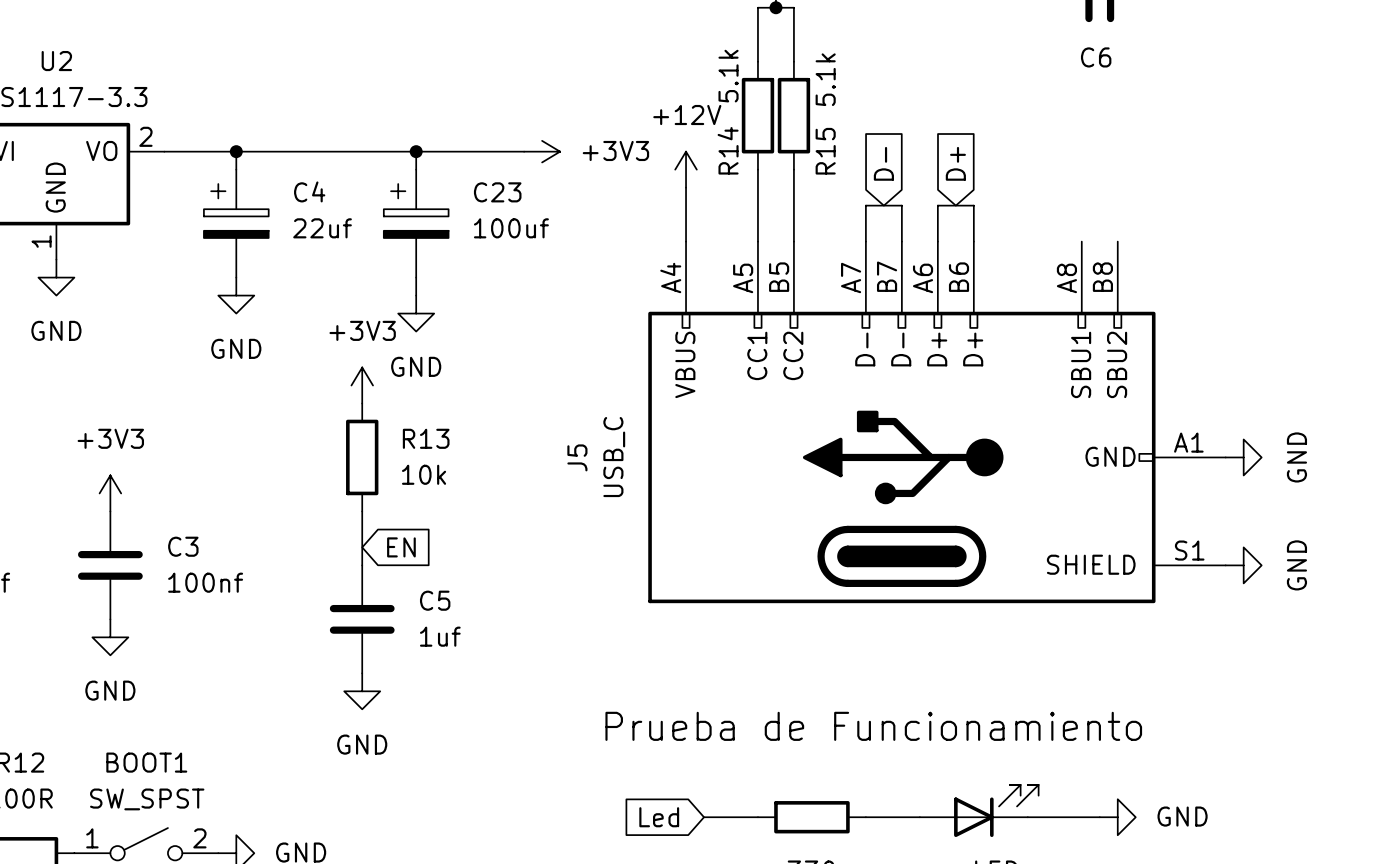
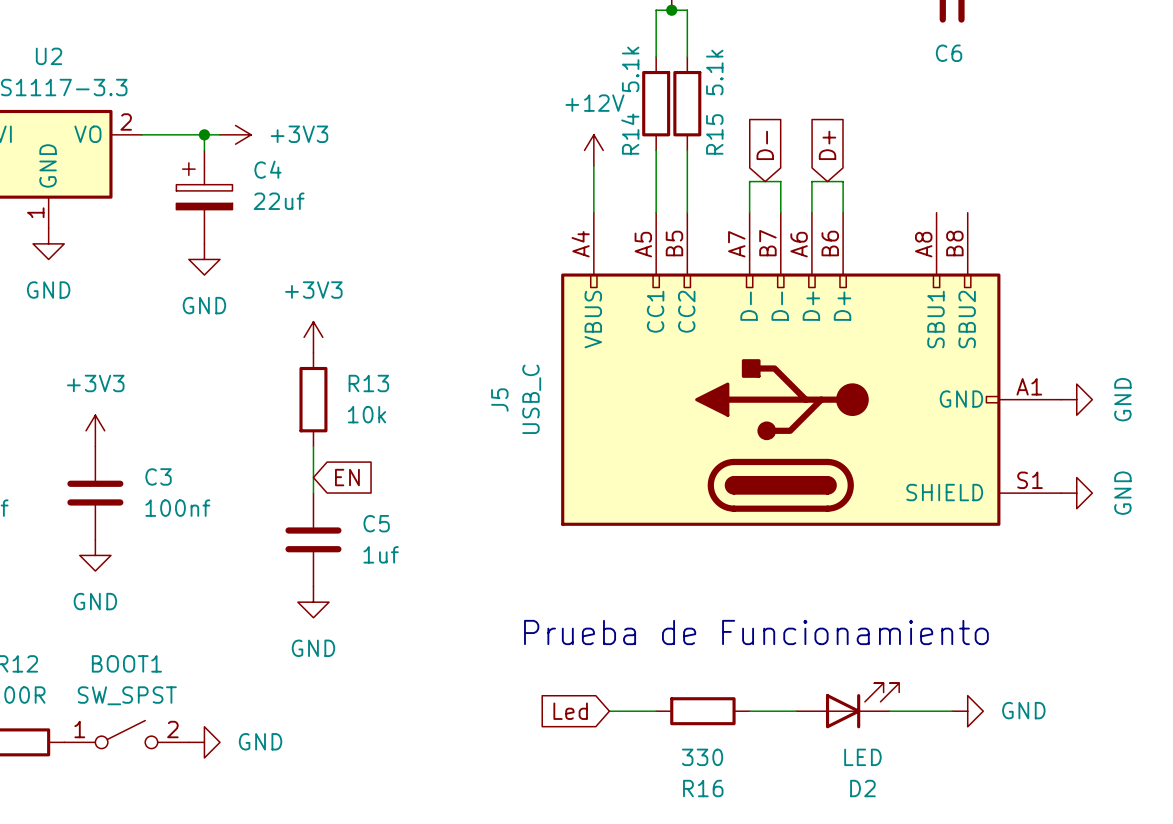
wire: (254, 151) (524, 151) -> none
wire: (416, 151) (416, 169) -> none
junction: (416, 151) -> none
power symbol position: +3V3 (542, 151) -> +3V3 (235, 134)
C23: 100uf (416, 223) -> none
wire: (416, 277) (416, 295) -> none
power symbol: GND (416, 313) -> none

